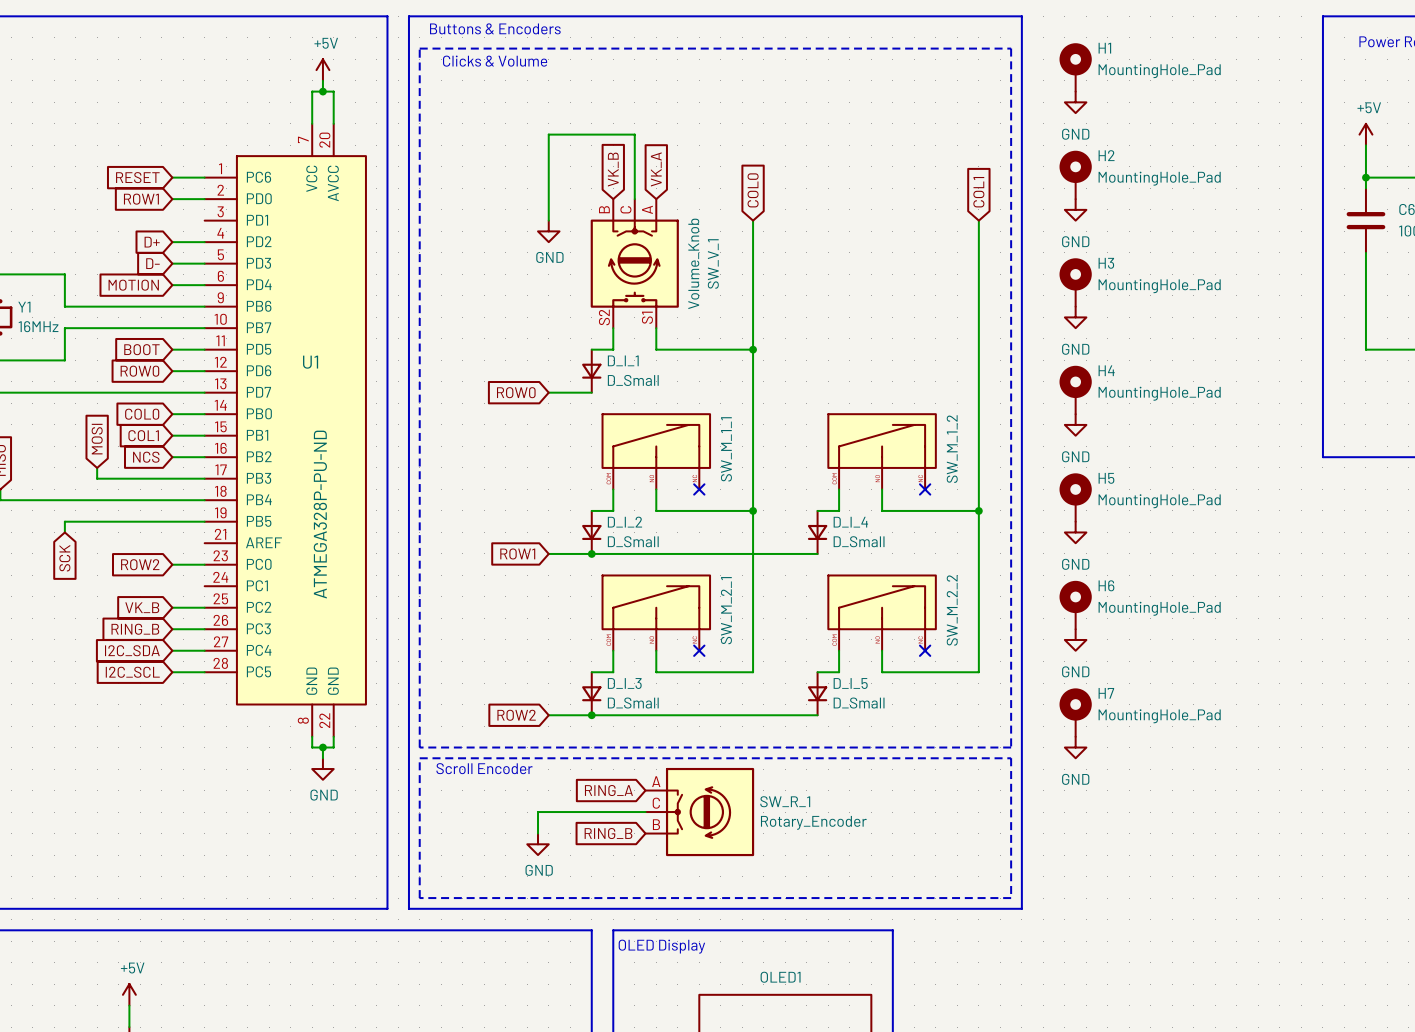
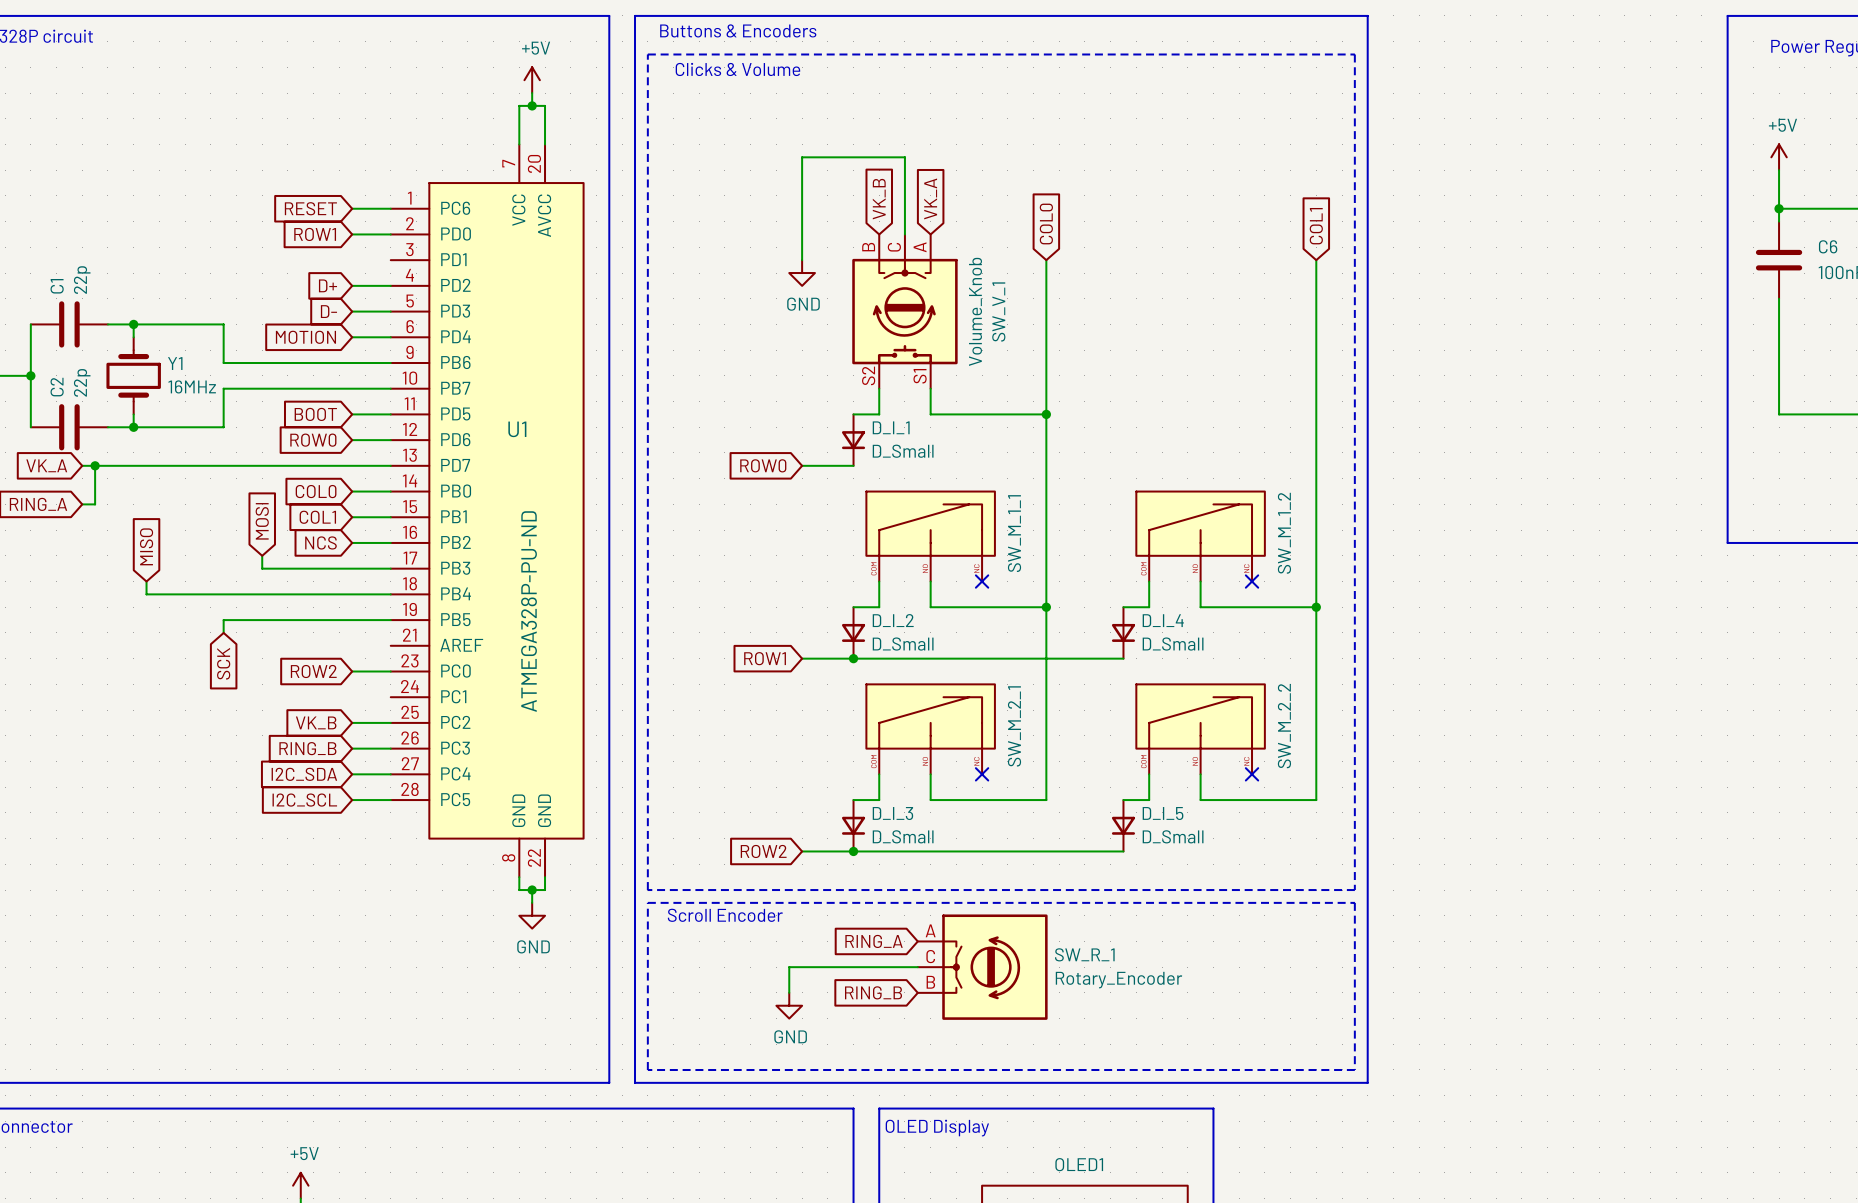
H1: MountingHole_Pad (1075, 67) -> none
power symbol: GND (1075, 102) -> none
H2: MountingHole_Pad (1075, 174) -> none
power symbol: GND (1075, 209) -> none
H3: MountingHole_Pad (1075, 282) -> none
power symbol: GND (1075, 317) -> none
H4: MountingHole_Pad (1075, 389) -> none
power symbol: GND (1075, 424) -> none
H5: MountingHole_Pad (1075, 497) -> none
power symbol: GND (1075, 532) -> none
H6: MountingHole_Pad (1075, 605) -> none
power symbol: GND (1075, 639) -> none
H7: MountingHole_Pad (1075, 712) -> none
power symbol: GND (1075, 747) -> none

